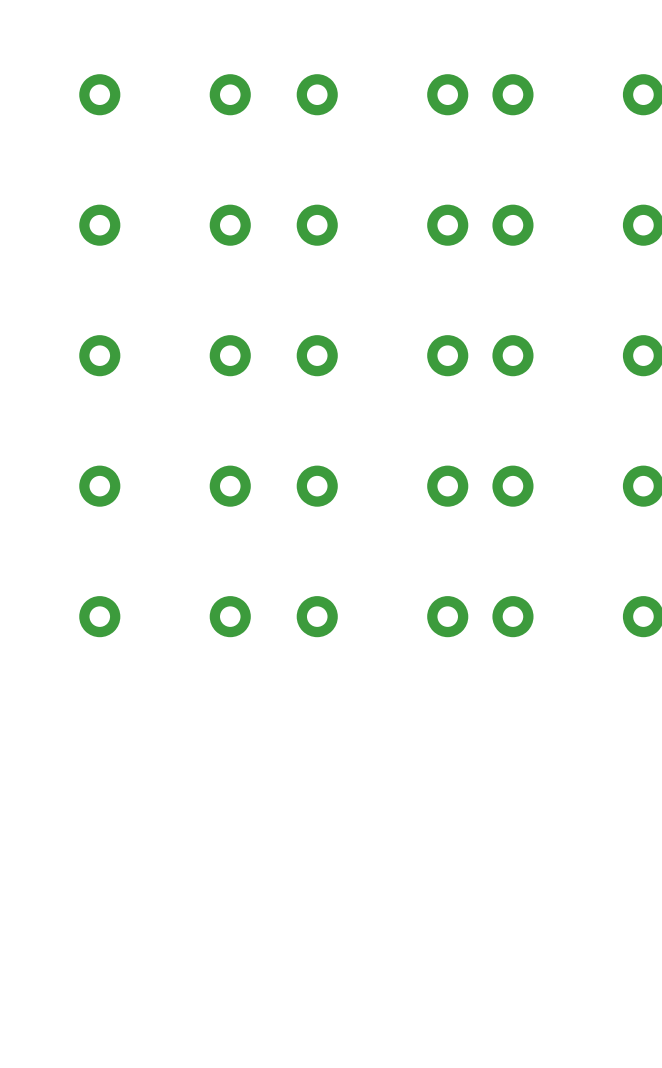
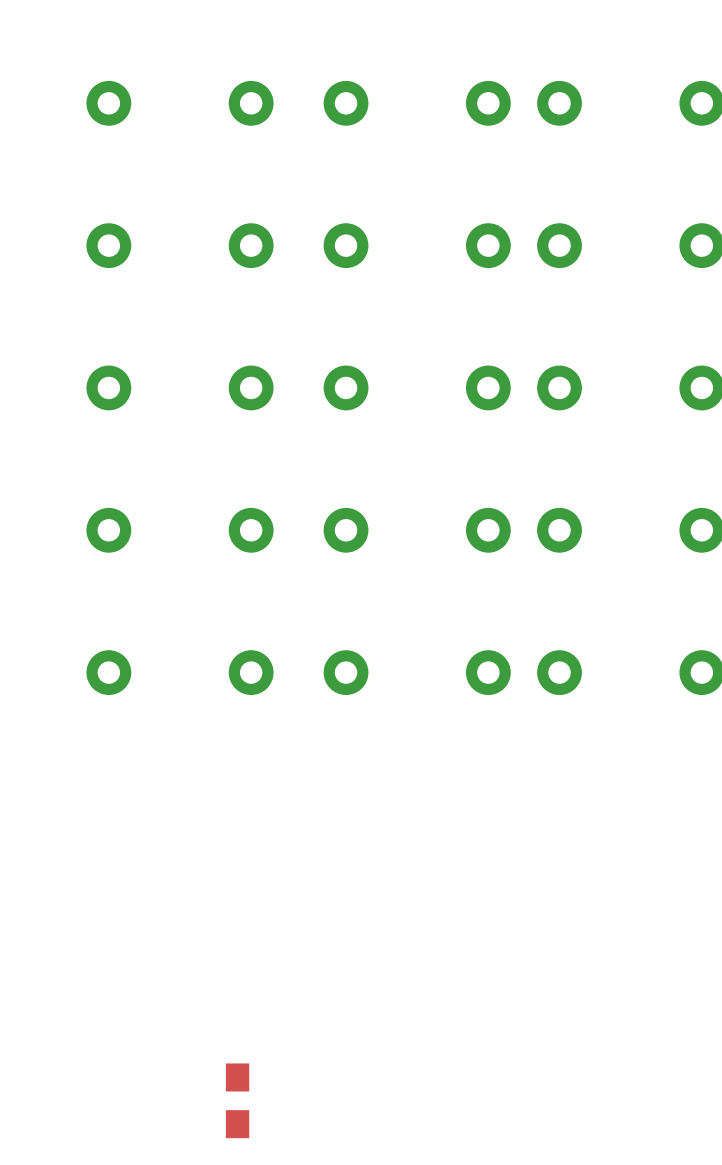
part: none -> (237, 1100)

